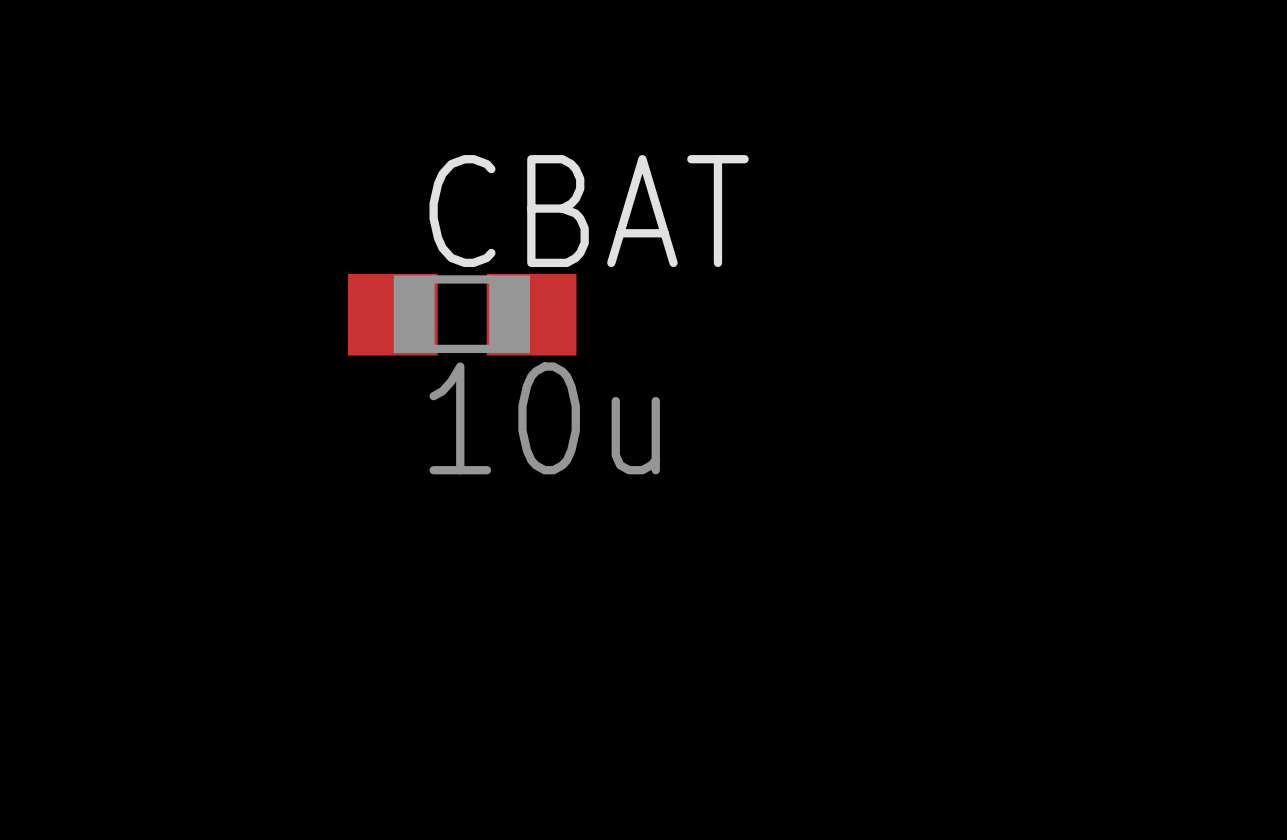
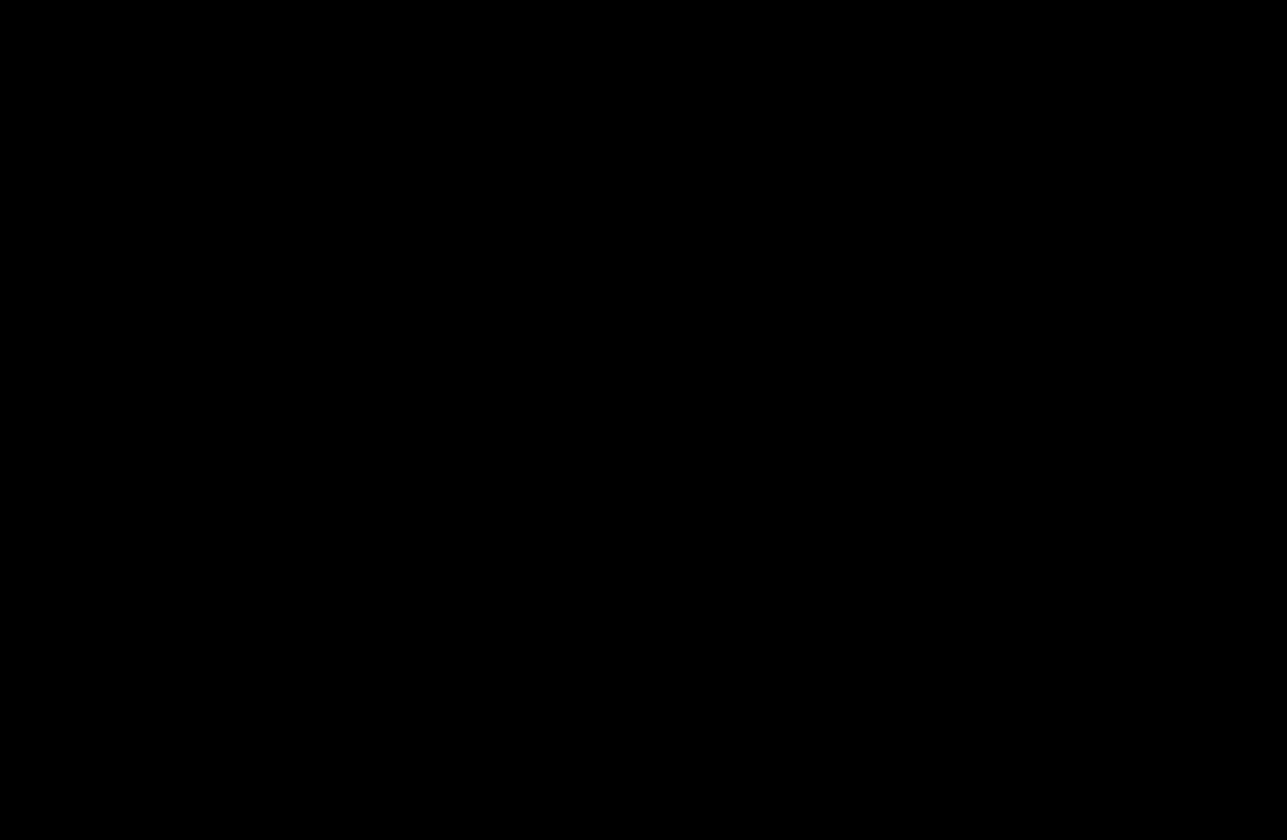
CBAT: 10u (462, 314) -> none

